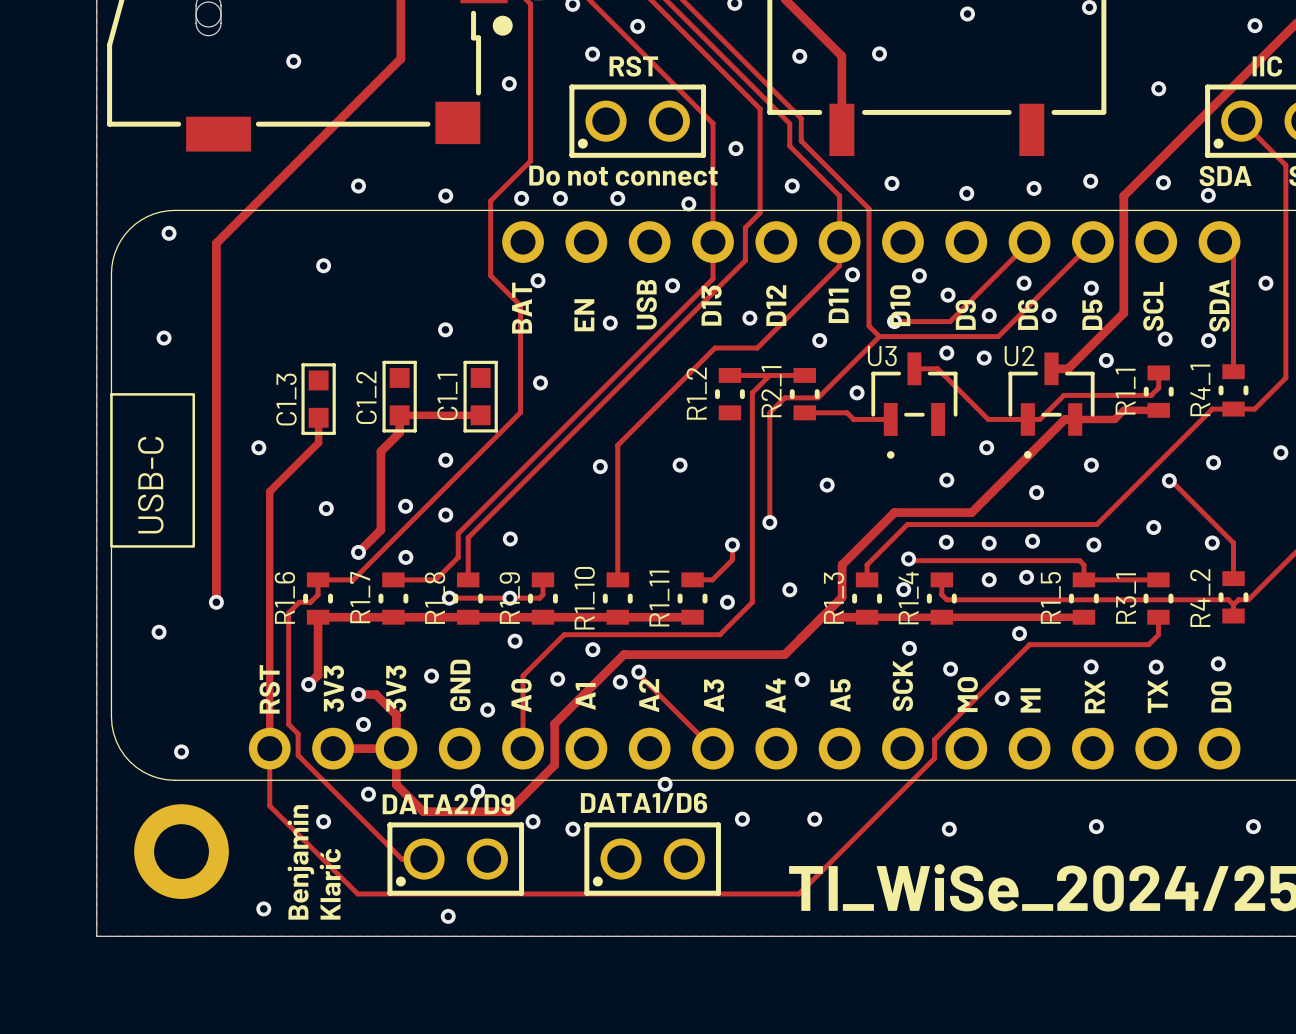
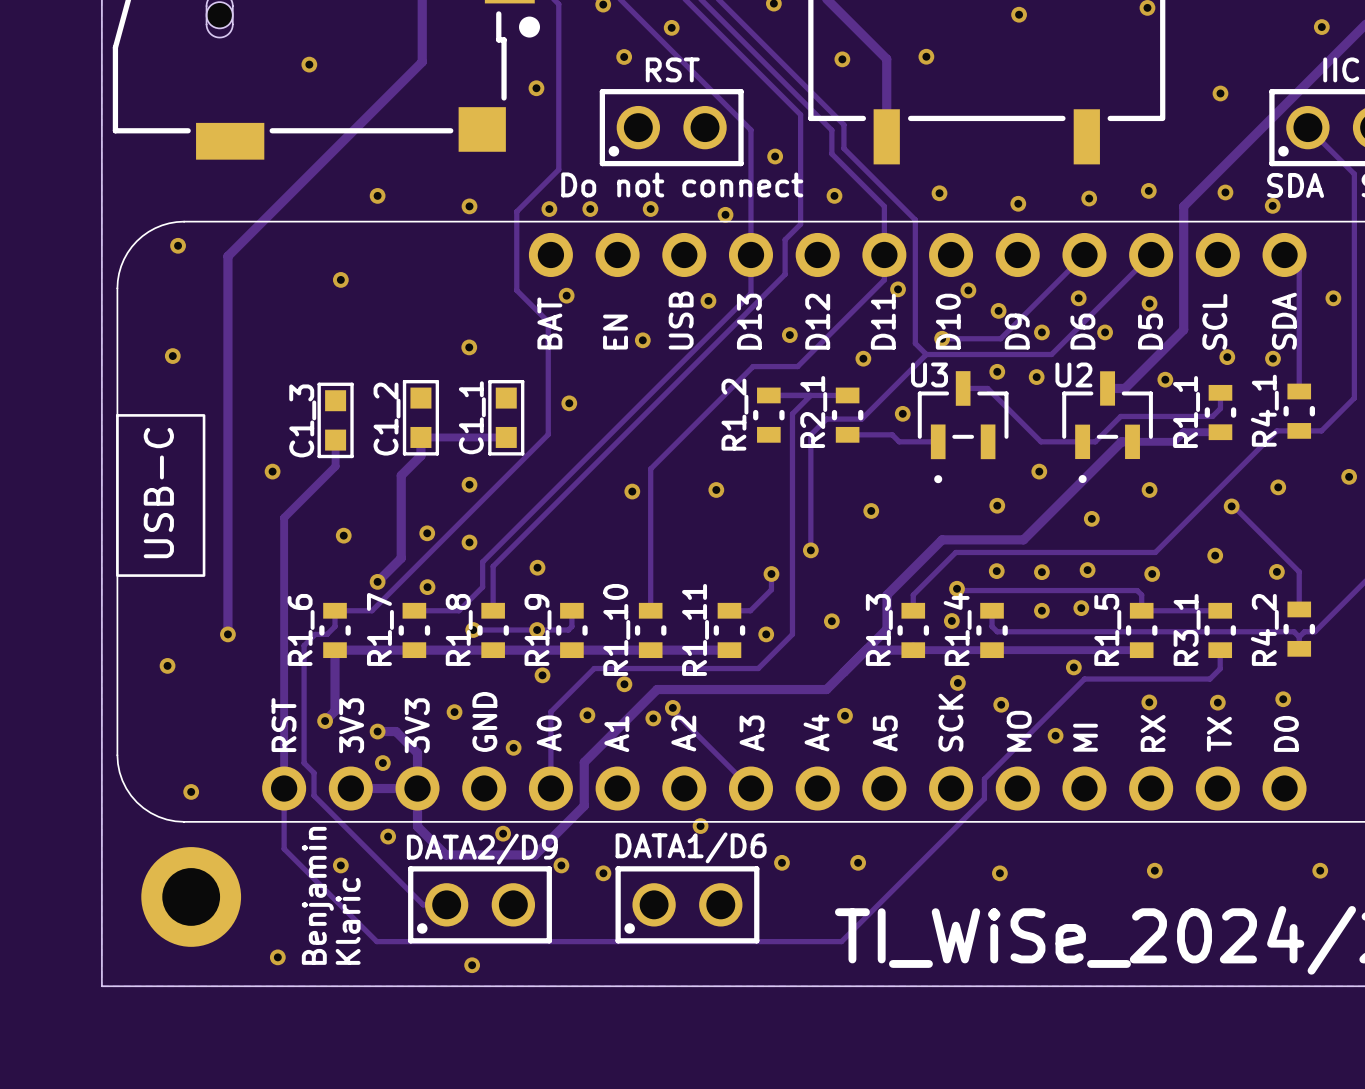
text: Klarić (330, 884) -> Klaric (348, 921)

